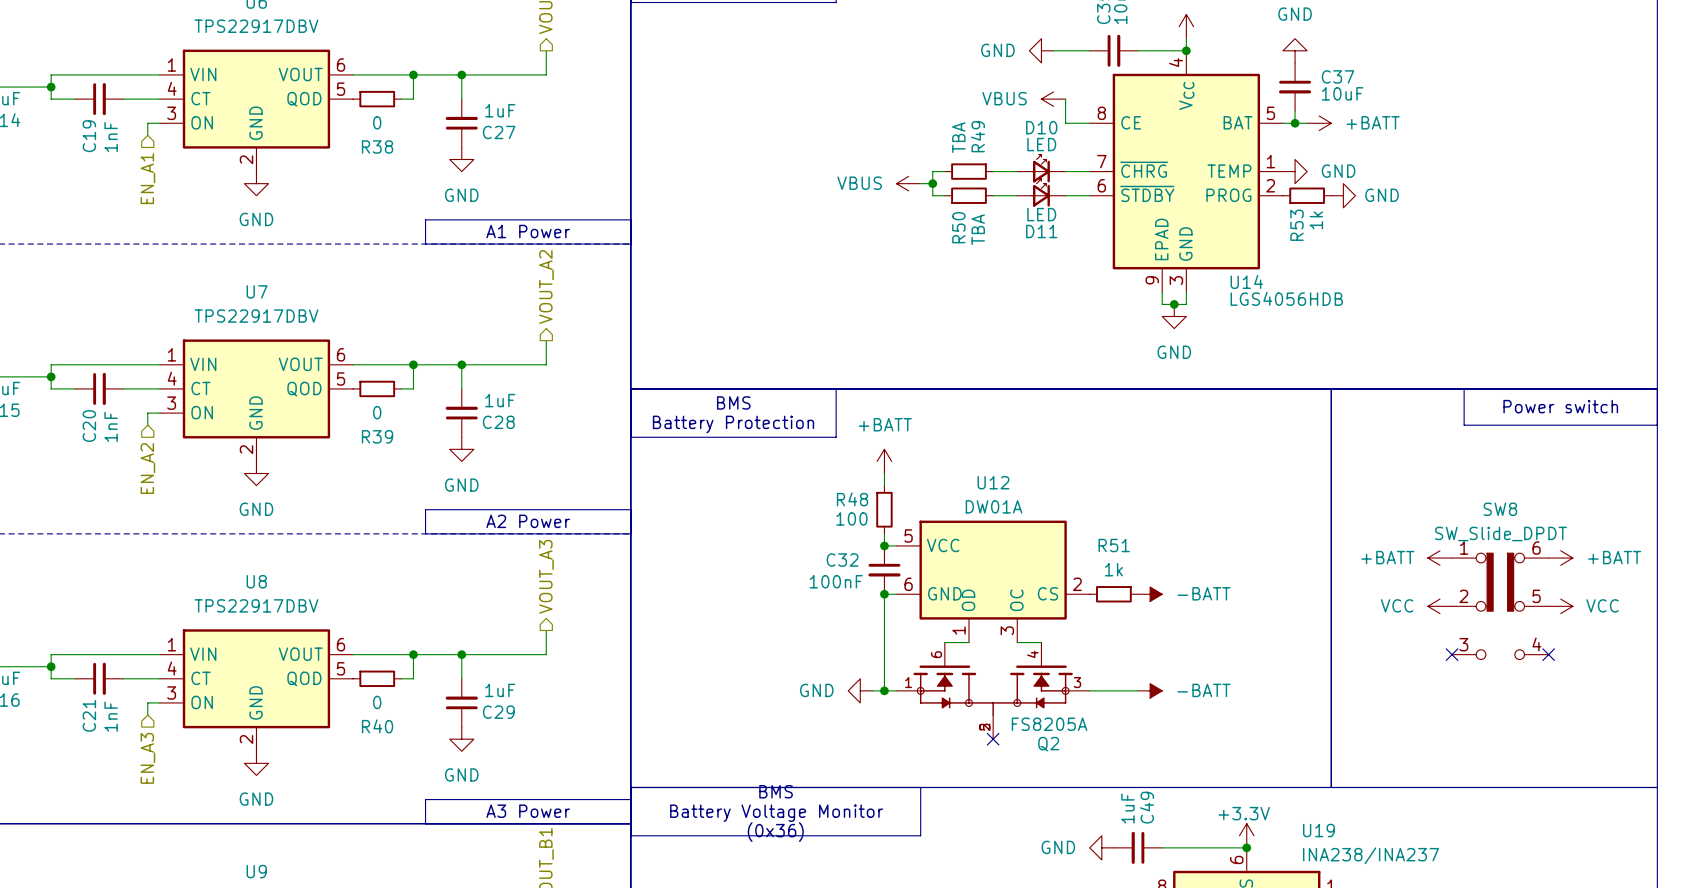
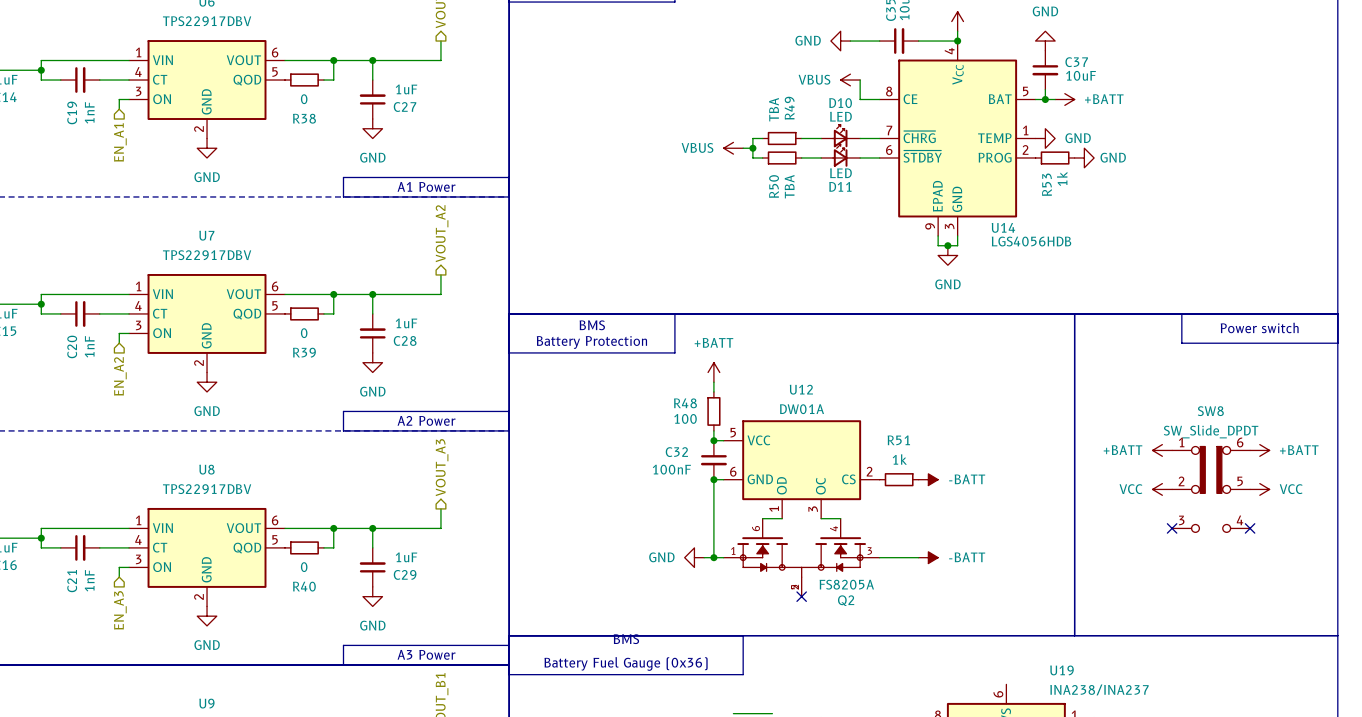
text: Battery Voltage Monitor (776, 813) -> none
text: none -> Battery Fuel Gauge (0x36) (626, 663)
text: (0x36) (775, 832) -> none
power symbol: +3.3V (1246, 835) -> none
power symbol: GND (1101, 847) -> none
C49: 1uF (1138, 847) -> none
wire: (1162, 847) (1246, 847) -> none
junction: (1246, 847) -> none
wire: none -> (733, 713) (772, 713)

